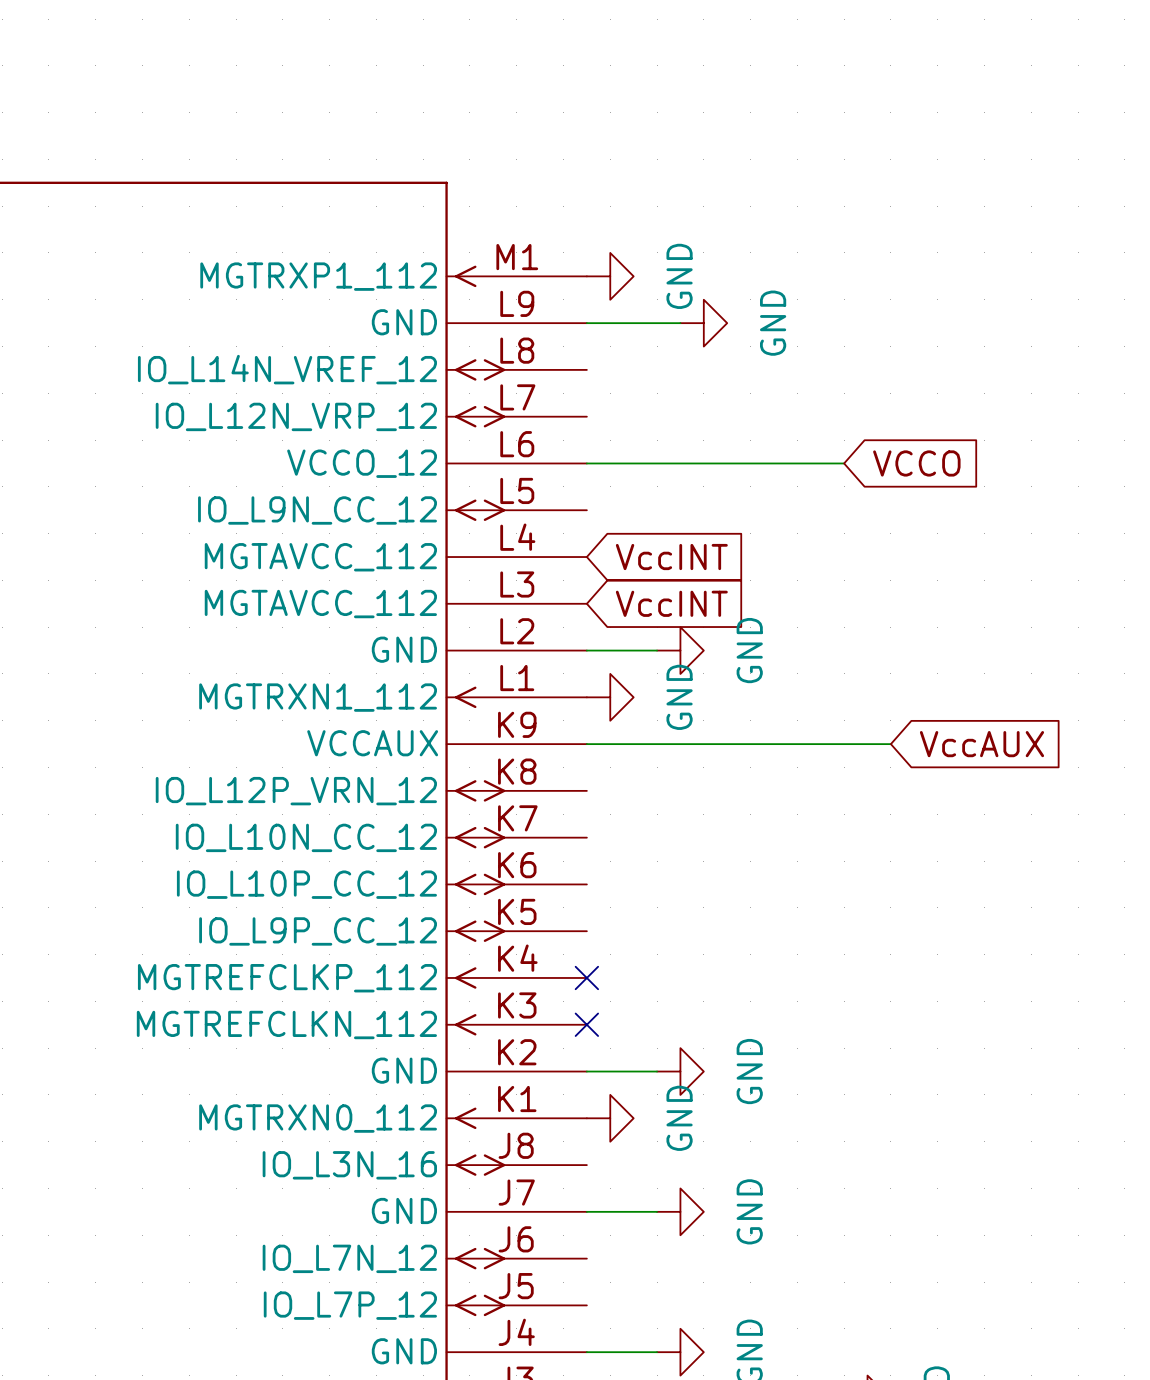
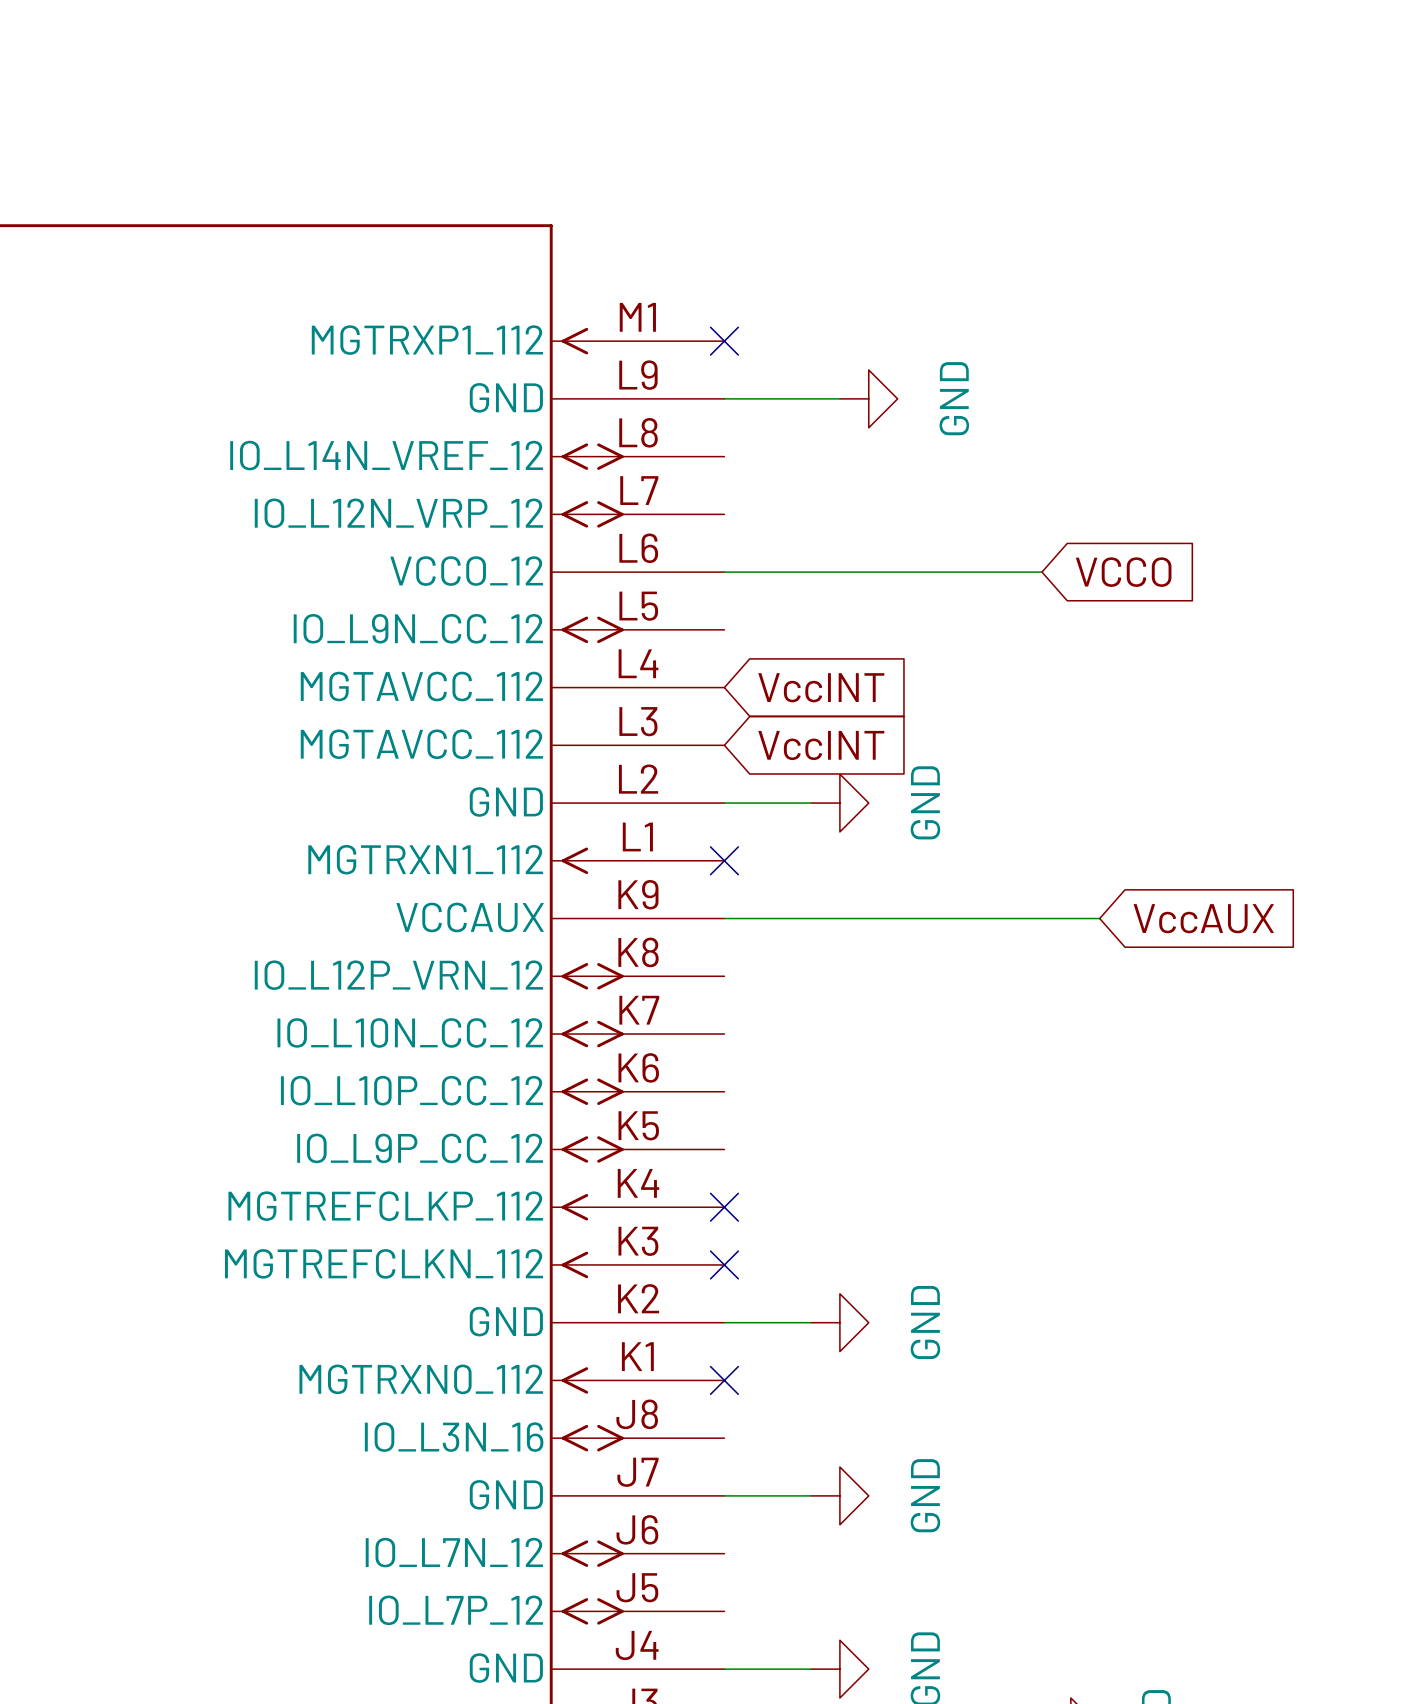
no-connect mark: none -> (724, 341)
power symbol: GND (610, 276) -> none
no-connect mark: none -> (724, 860)
power symbol: GND (610, 697) -> none
no-connect mark: none -> (724, 1380)
power symbol: GND (610, 1118) -> none

